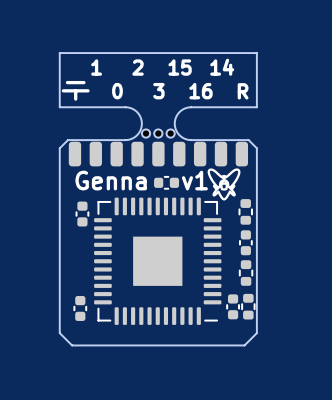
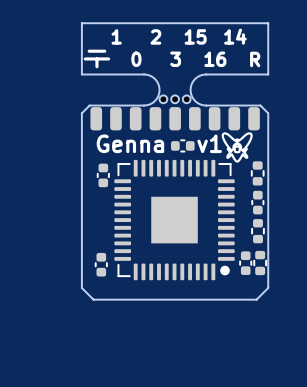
part footprint: [94, 197, 222, 325] -> [114, 159, 235, 281]

